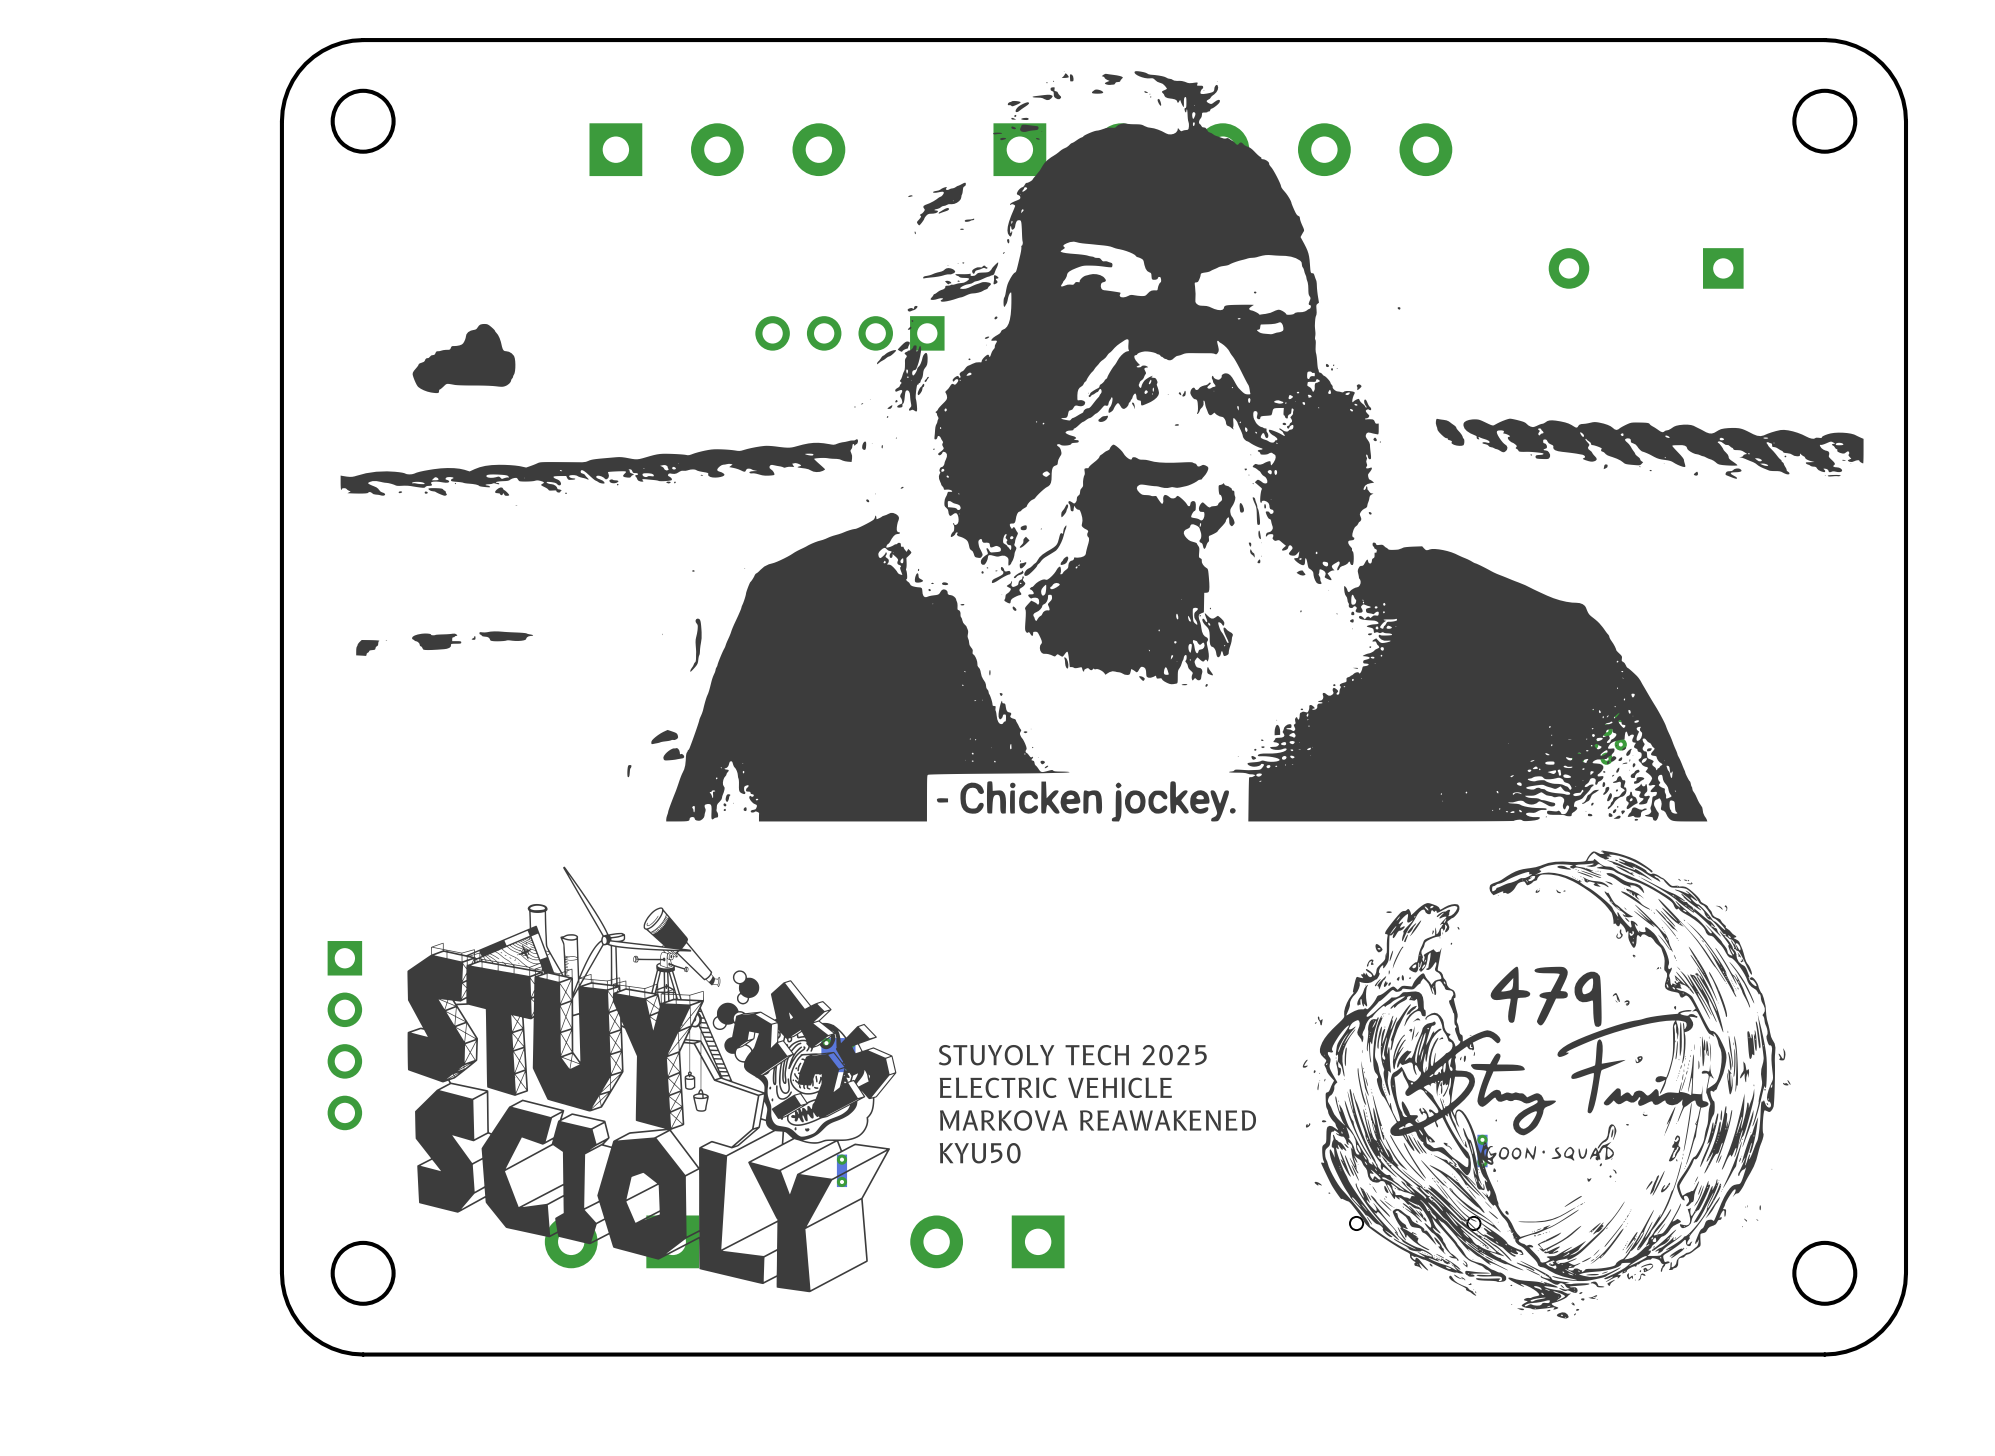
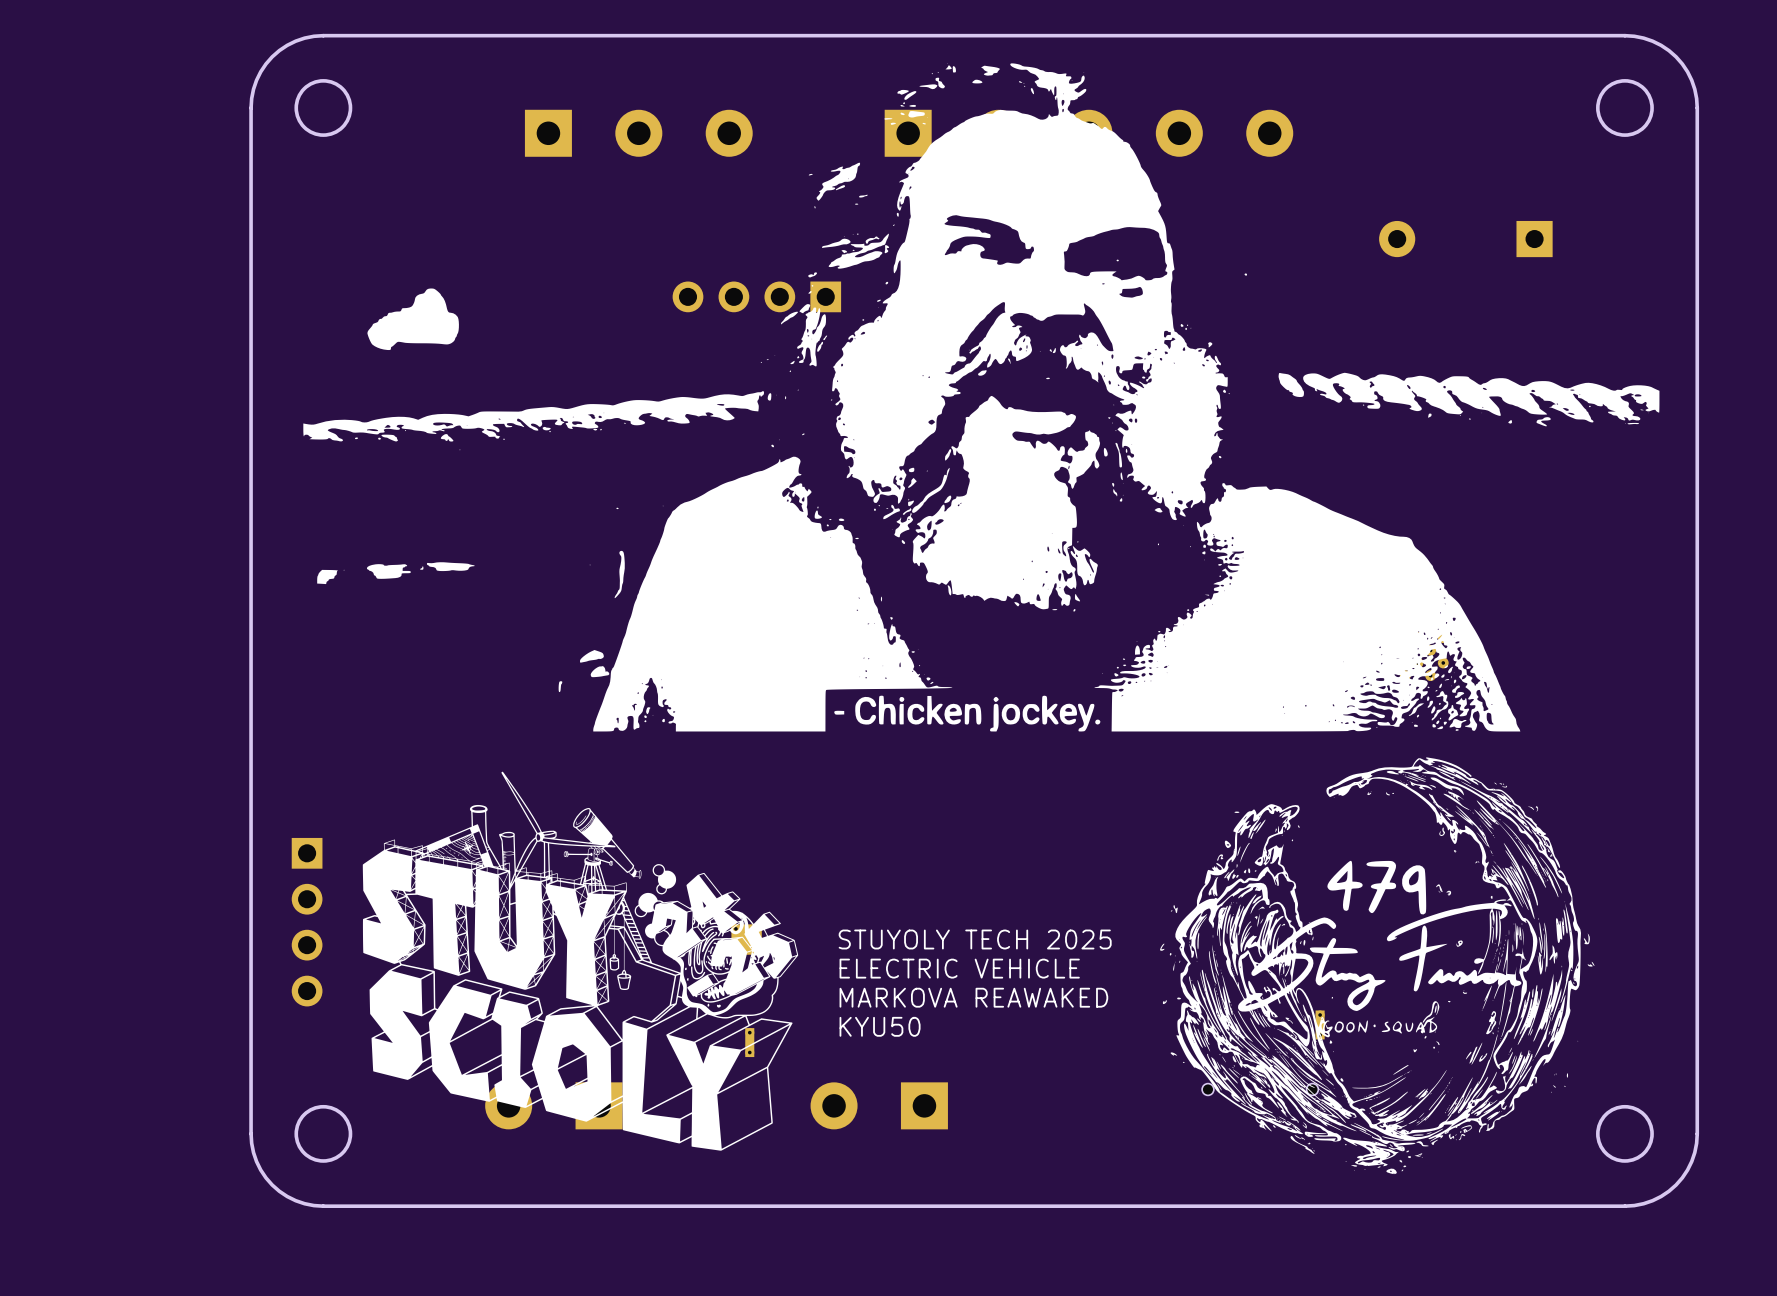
text: MARKOVA REAWAKENED (1098, 1120) -> MARKOVA REAWAKED (973, 997)

